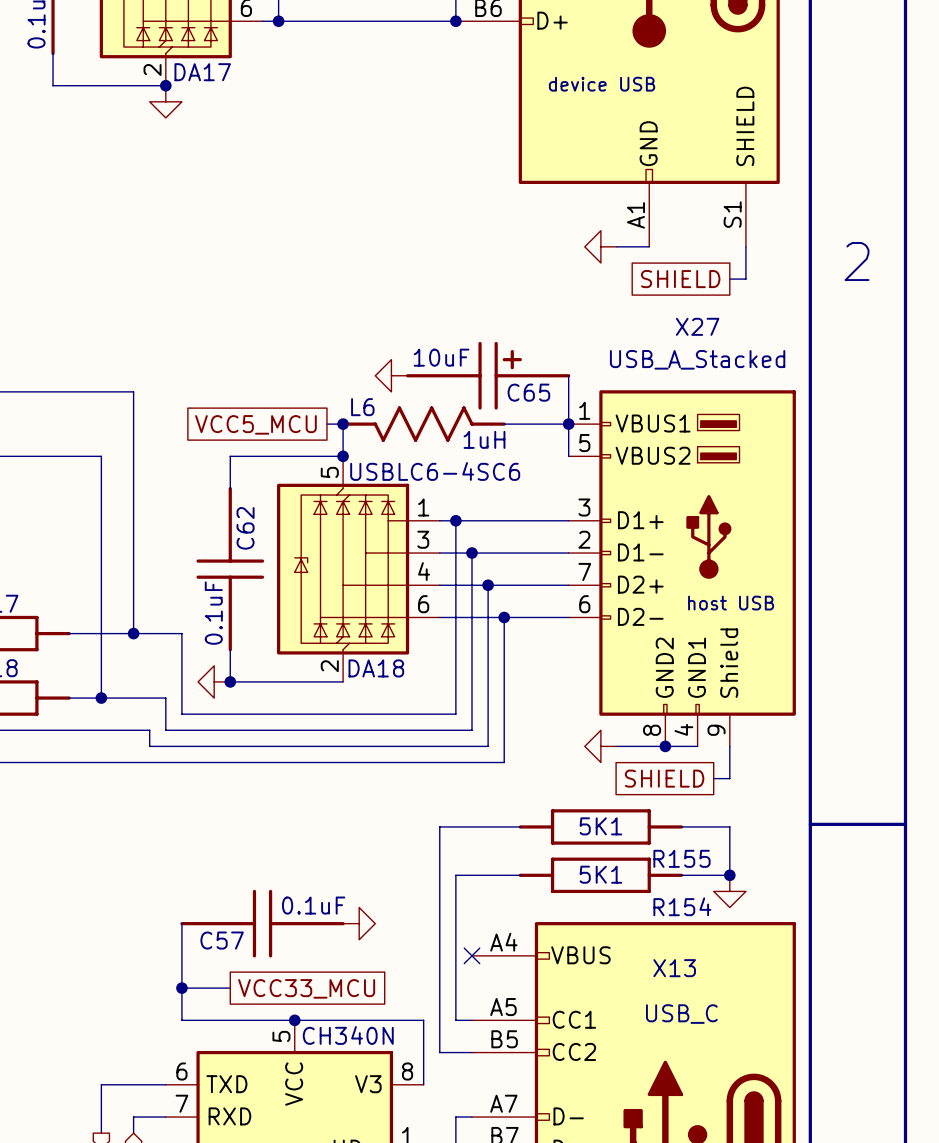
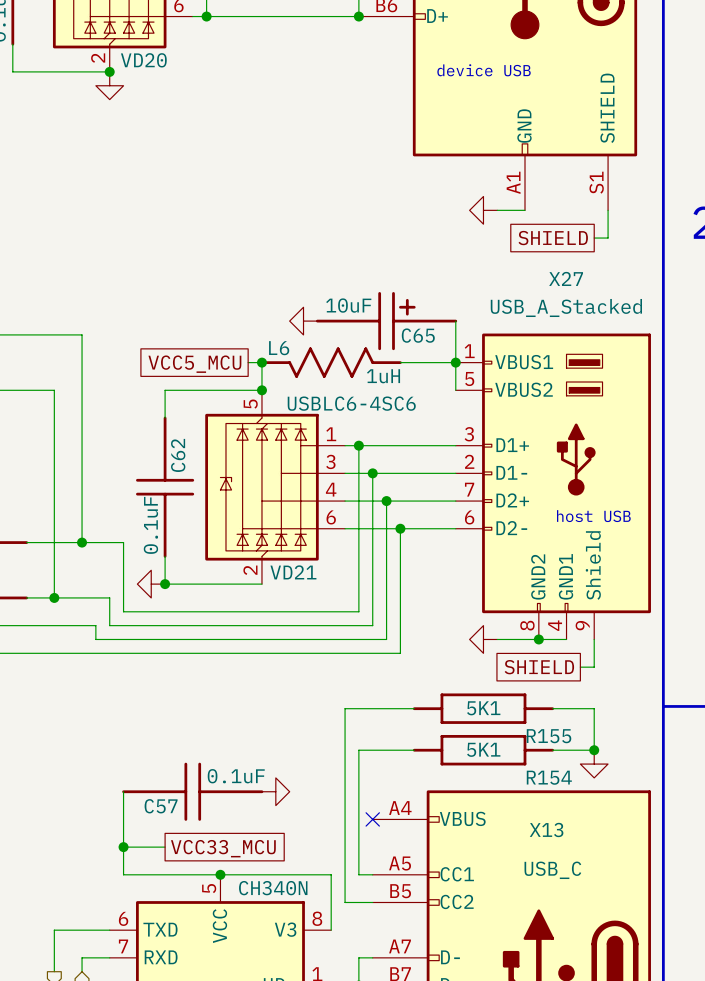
DA17 name: DA17 (202, 72) -> VD20 (143, 60)
DA18 name: DA18 (376, 668) -> VD21 (293, 572)

